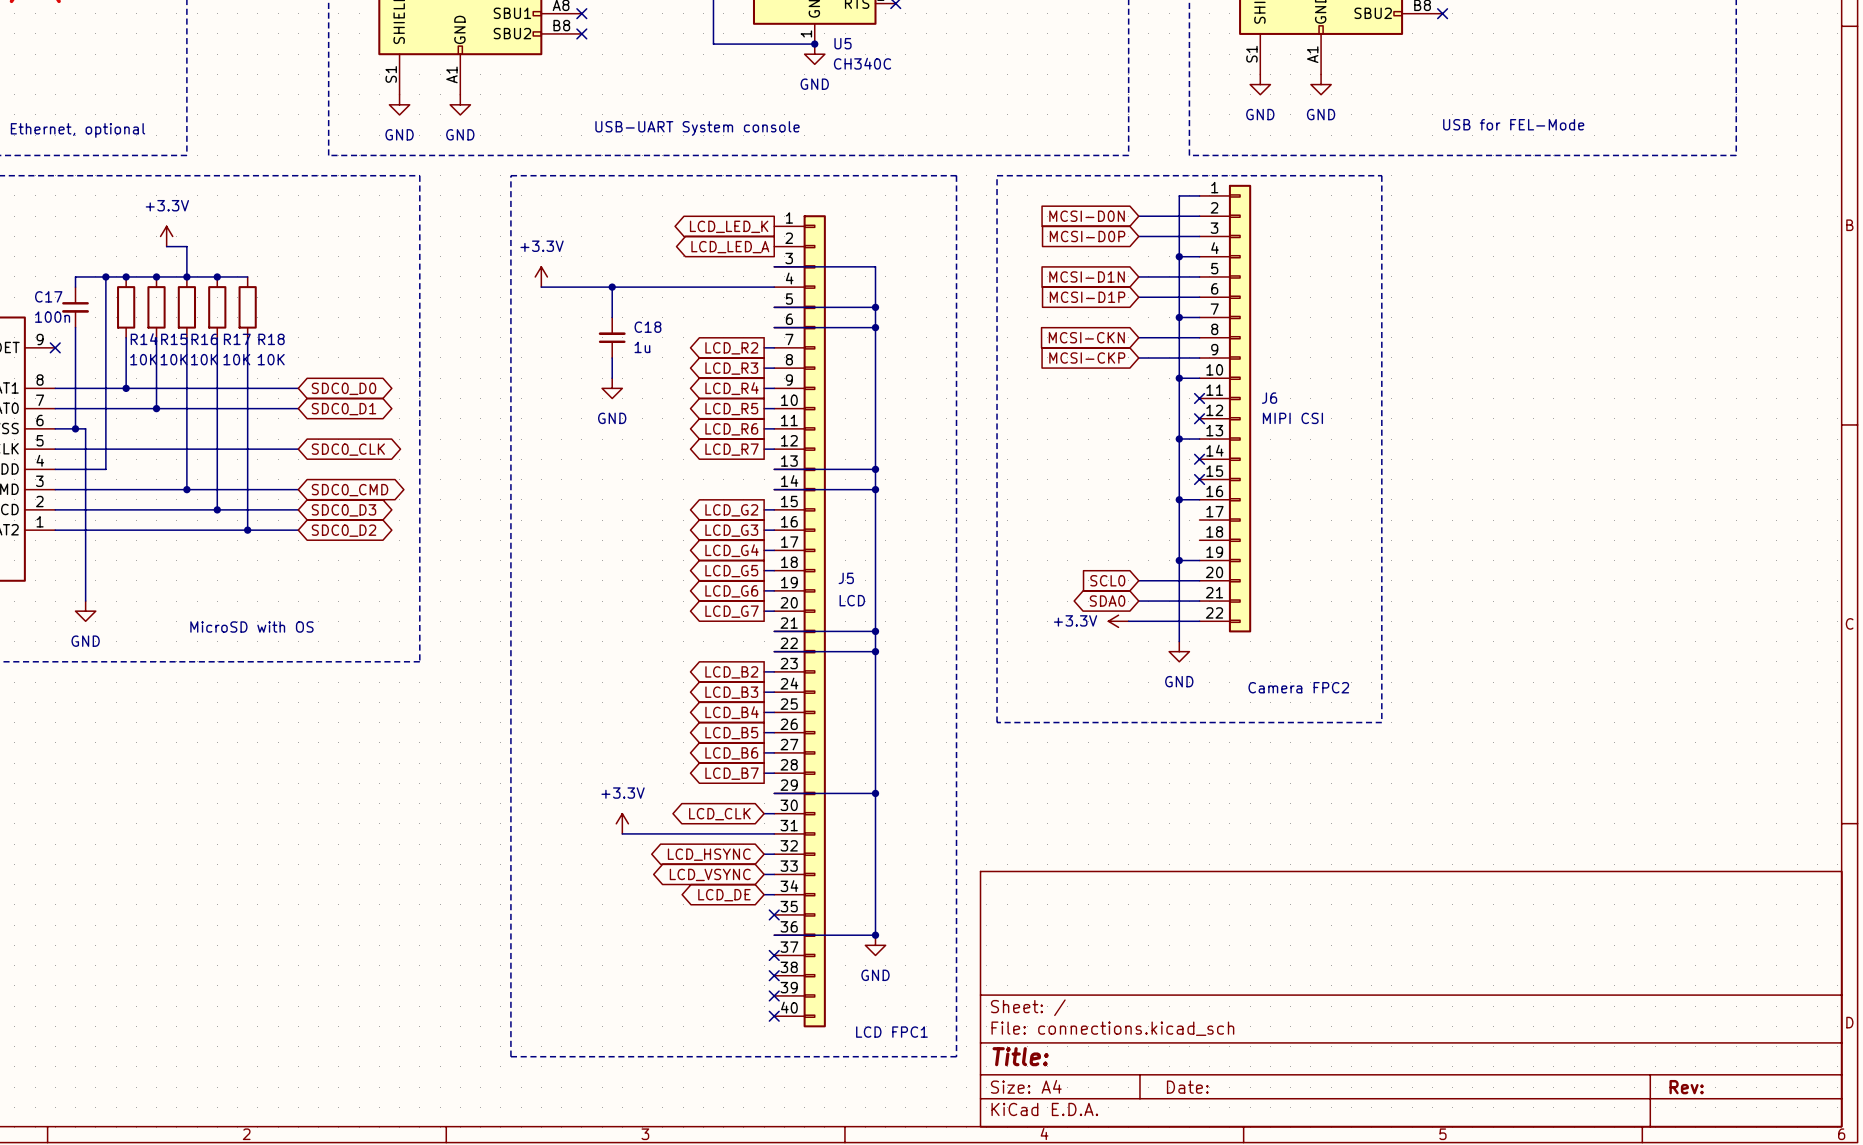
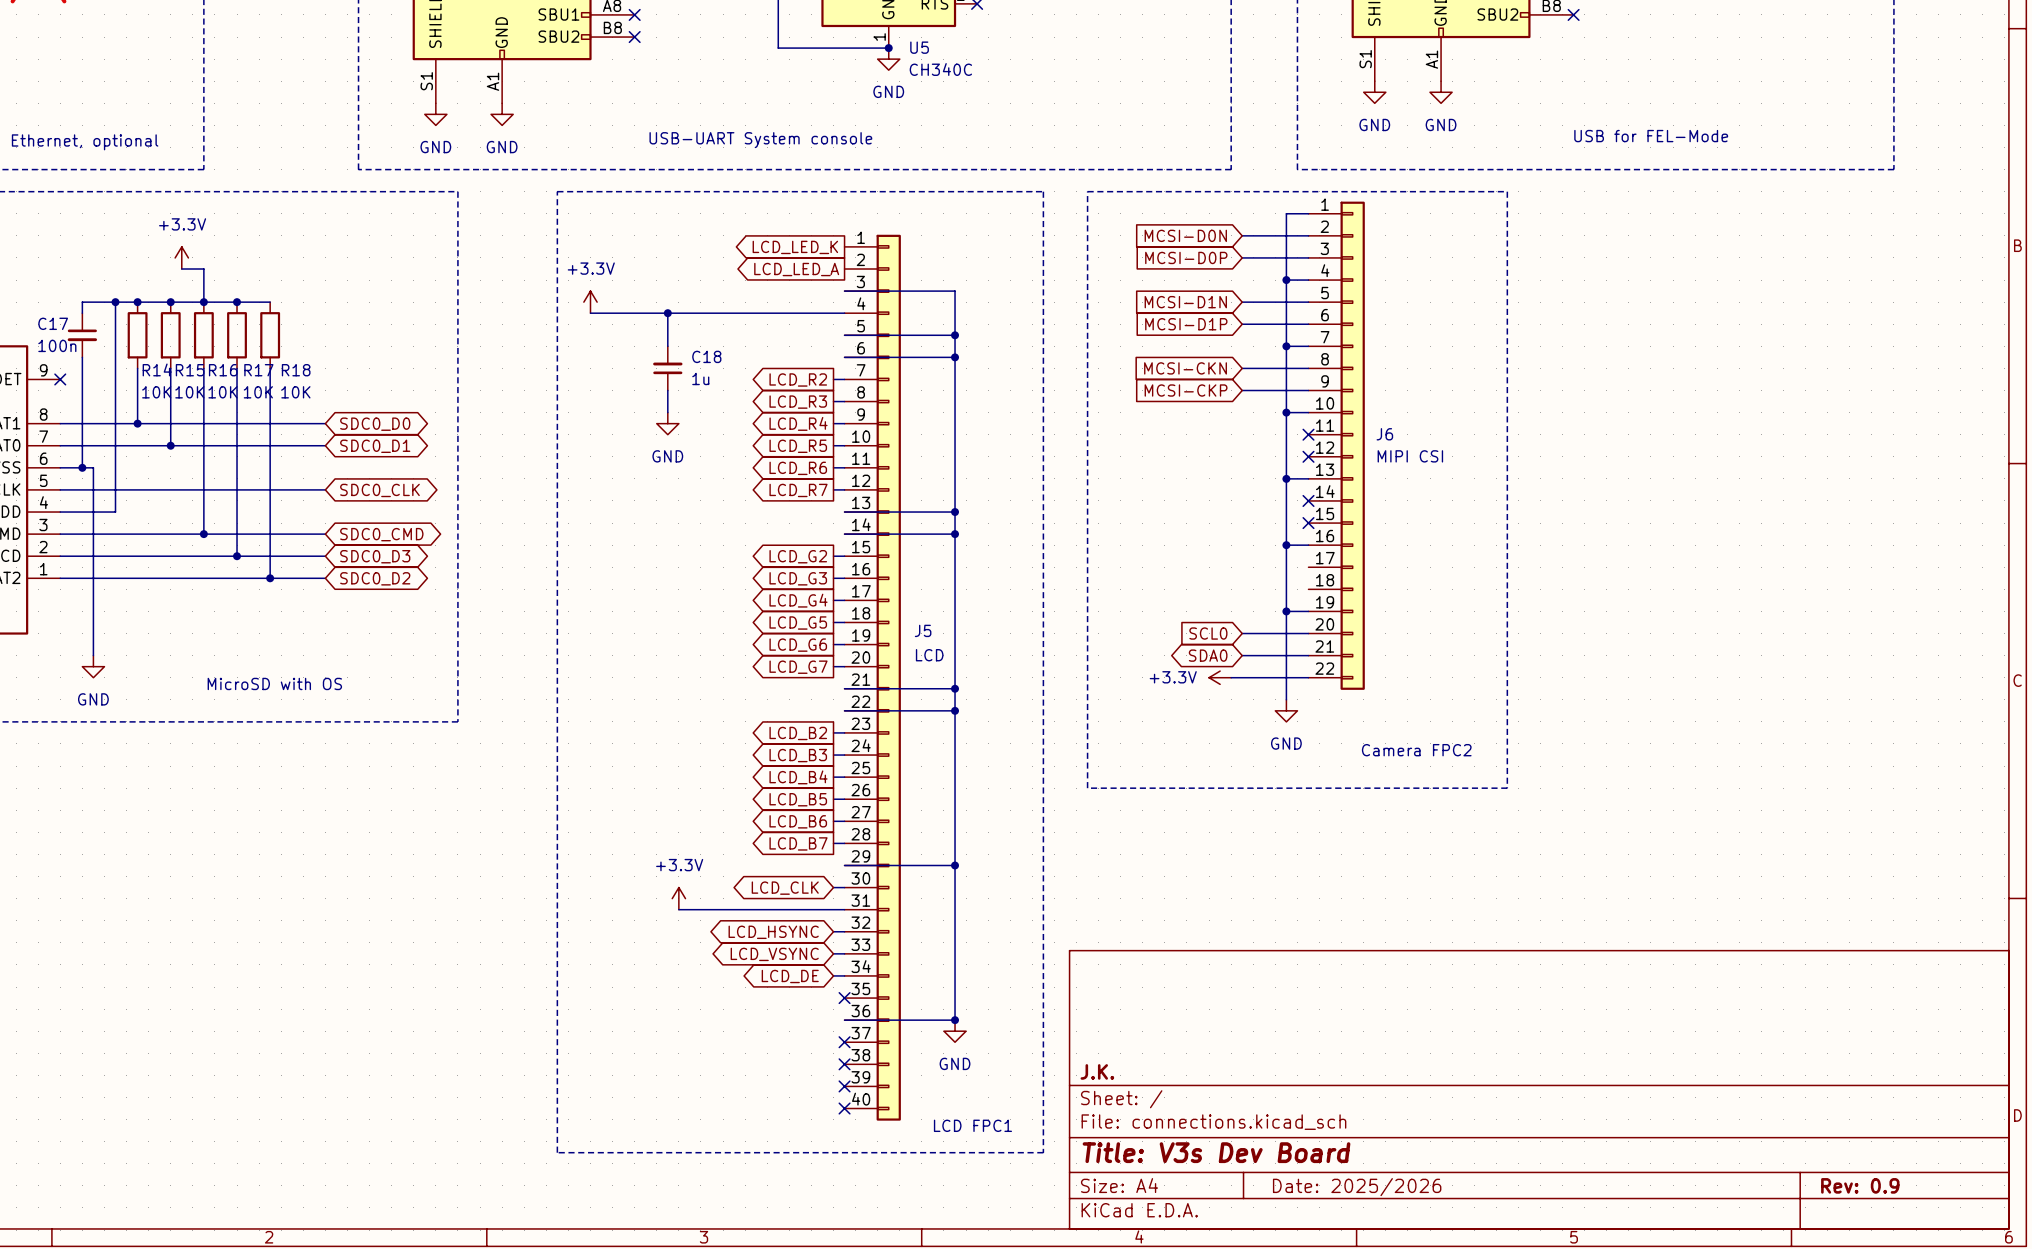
title block: none -> J.K. (1097, 1071)
title block: Title: (1020, 1056) -> Title: V3s Dev Board (1216, 1152)
title block: Date: (1187, 1087) -> Date: 2025/2026 (1357, 1187)
title block: Rev: (1686, 1087) -> Rev: 0.9 (1860, 1185)

